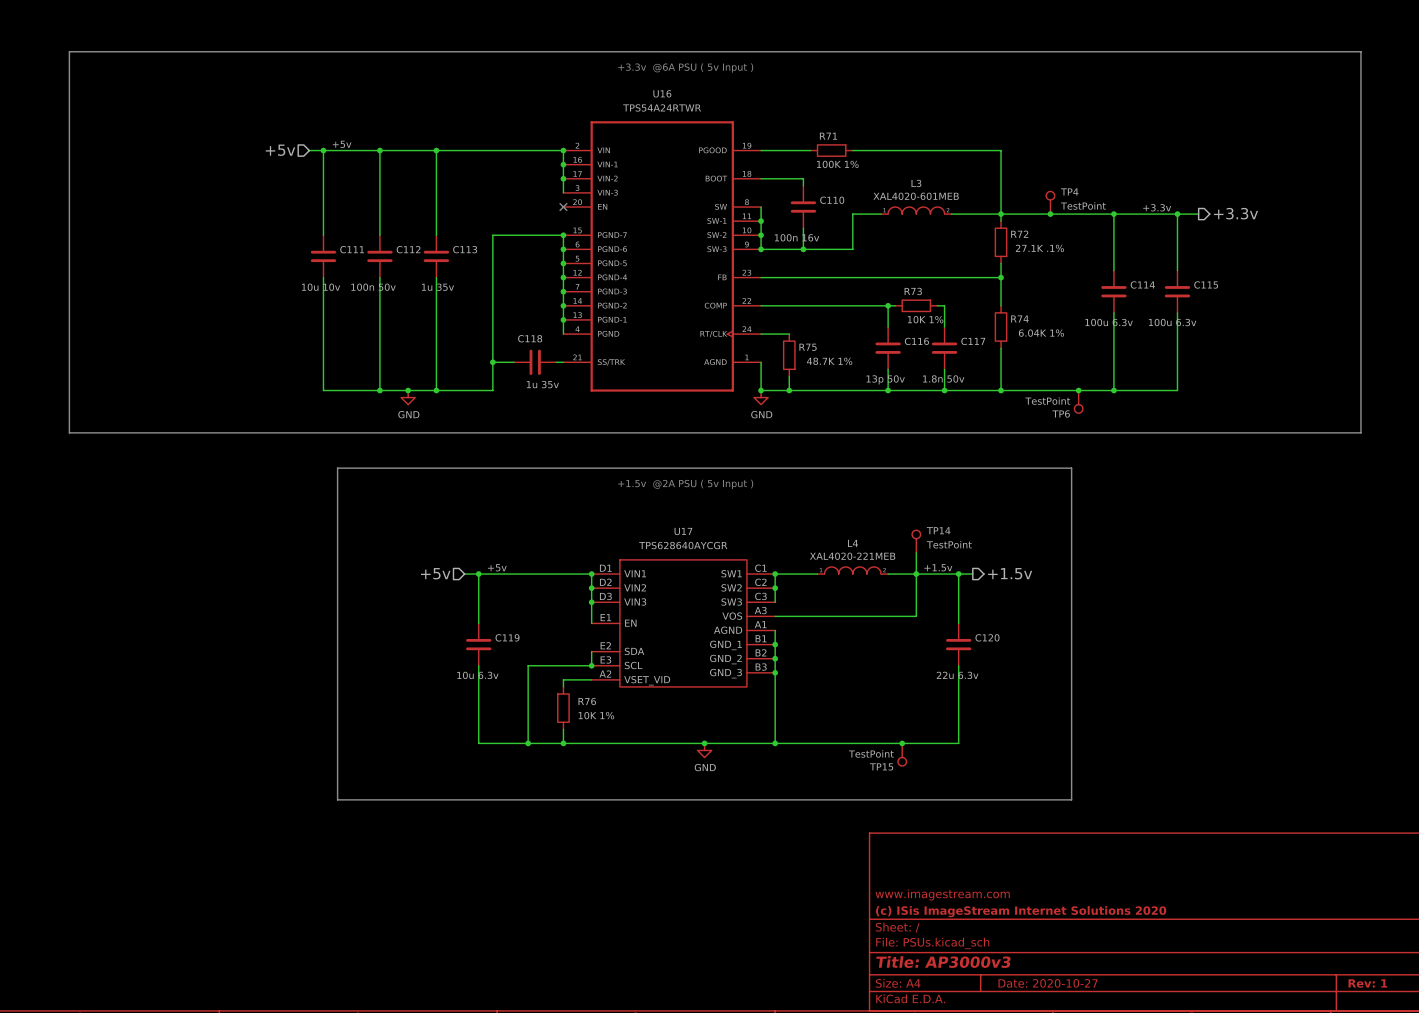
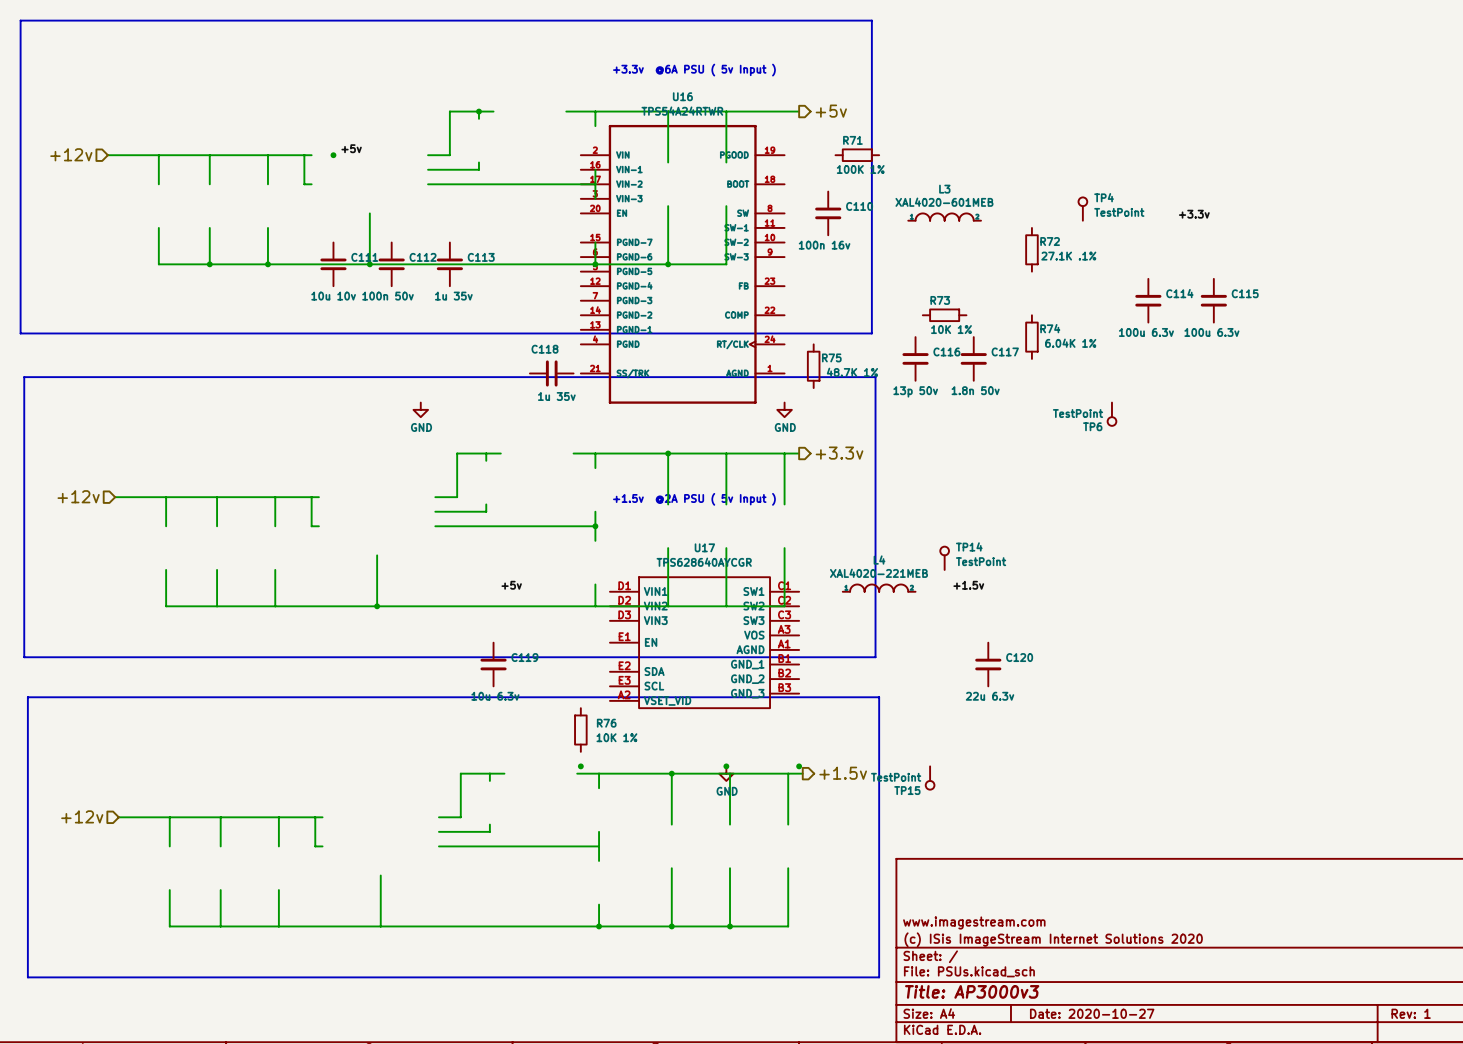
line: none -> (20, 20) (20, 333) (871, 333) (871, 20) (20, 20)
line: (69, 51) (69, 432) (1360, 432) (1360, 51) (69, 51) -> none
hierarchical label: none -> +5v (831, 111)
wire: none -> (478, 111) (478, 118)
junction: none -> (478, 111)
wire: none -> (493, 111) (449, 111) (449, 155)
wire: none -> (566, 111) (799, 111)
wire: none -> (595, 111) (595, 126)
wire: none -> (668, 111) (668, 162)
wire: none -> (726, 111) (726, 162)
hierarchical label: none -> +12v (71, 154)
wire: none -> (107, 155) (311, 155)
wire: none -> (158, 155) (158, 184)
wire: none -> (209, 155) (209, 184)
wire: none -> (267, 155) (267, 184)
hierarchical label: +5v (280, 150) -> none
wire: none -> (304, 155) (304, 184) (311, 184)
wire: (309, 150) (415, 150) -> none
wire: (323, 150) (323, 235) -> none
wire: (379, 150) (379, 235) -> none
junction: (379, 150) -> none
junction: (436, 150) -> none
junction: (563, 150) -> none
wire: (761, 150) (810, 150) -> none
wire: (852, 150) (1001, 150) (1001, 221) -> none
wire: none -> (478, 162) (478, 169) (428, 169)
junction: (563, 164) -> none
wire: none -> (595, 169) (595, 198)
wire: none -> (428, 184) (595, 184)
junction: (563, 178) -> none
wire: (761, 178) (803, 178) (803, 185) -> none
wire: (563, 192) (563, 150) (436, 150) (436, 235) -> none
wire: none -> (668, 206) (668, 264)
wire: none -> (726, 206) (726, 264) (158, 264) (158, 227)
wire: none -> (369, 213) (369, 264)
no-connect mark: (563, 207) -> none
wire: (761, 207) (761, 249) (852, 249) (852, 214) (881, 214) -> none
hierarchical label: +3.3v (1235, 213) -> none
wire: (951, 214) (1198, 214) -> none
junction: (1001, 214) -> none
junction: (1050, 214) -> none
wire: (1113, 214) (1113, 270) -> none
junction: (1113, 214) -> none
wire: (1177, 214) (1177, 270) -> none
junction: (1177, 214) -> none
wire: none -> (209, 227) (209, 264)
wire: none -> (267, 227) (267, 264)
junction: (761, 221) -> none
wire: (803, 228) (803, 249) -> none
junction: (563, 235) -> none
wire: none -> (595, 242) (595, 264)
junction: (761, 235) -> none
junction: (563, 249) -> none
junction: (761, 249) -> none
junction: (803, 249) -> none
junction: none -> (209, 264)
junction: none -> (267, 264)
junction: none -> (369, 264)
junction: none -> (595, 264)
junction: none -> (668, 264)
junction: (563, 263) -> none
wire: (1001, 263) (1001, 305) -> none
wire: (323, 277) (323, 390) (492, 390) (492, 235) (563, 235) (563, 334) -> none
wire: (379, 277) (379, 390) -> none
wire: (436, 277) (436, 390) -> none
junction: (563, 277) -> none
wire: (761, 277) (1001, 277) -> none
junction: (1001, 277) -> none
junction: (563, 291) -> none
junction: (563, 305) -> none
wire: (761, 305) (895, 305) -> none
wire: (888, 305) (888, 327) -> none
junction: (888, 305) -> none
wire: (937, 305) (944, 305) (944, 327) -> none
wire: (1113, 312) (1113, 390) -> none
wire: (1177, 312) (1177, 390) (761, 390) (761, 362) -> none
junction: (563, 319) -> none
wire: (761, 334) (789, 334) -> none
wire: (1001, 348) (1001, 390) -> none
wire: (492, 362) (514, 362) -> none
junction: (492, 362) -> none
wire: (556, 362) (563, 362) -> none
line: none -> (24, 377) (24, 657) (875, 657) (875, 377) (24, 377)
wire: (888, 369) (888, 390) -> none
wire: (944, 369) (944, 390) -> none
wire: (789, 376) (789, 390) -> none
junction: (379, 390) -> none
junction: (408, 390) -> none
junction: (436, 390) -> none
junction: (761, 390) -> none
junction: (789, 390) -> none
junction: (888, 390) -> none
junction: (944, 390) -> none
junction: (1001, 390) -> none
junction: (1078, 390) -> none
junction: (1113, 390) -> none
wire: none -> (486, 453) (486, 460)
wire: none -> (500, 453) (457, 453) (457, 497) (435, 497)
wire: none -> (573, 453) (799, 453)
wire: none -> (595, 453) (595, 468)
wire: none -> (668, 453) (668, 504)
junction: none -> (668, 453)
wire: none -> (726, 453) (726, 504)
wire: none -> (784, 453) (784, 504)
hierarchical label: none -> +3.3v (839, 453)
line: (337, 468) (337, 799) (1071, 799) (1071, 468) (337, 468) -> none
hierarchical label: none -> +12v (78, 496)
wire: none -> (115, 497) (318, 497)
wire: none -> (166, 497) (166, 526)
wire: none -> (217, 497) (217, 526)
wire: none -> (275, 497) (275, 526)
wire: none -> (311, 497) (311, 526) (318, 526)
wire: none -> (486, 504) (486, 511) (435, 511)
wire: none -> (595, 511) (595, 540)
wire: none -> (435, 526) (595, 526)
junction: none -> (595, 526)
wire: none -> (668, 548) (668, 606)
wire: none -> (726, 548) (726, 606)
wire: none -> (784, 548) (784, 606) (166, 606) (166, 569)
wire: none -> (217, 569) (217, 606)
wire: none -> (275, 569) (275, 606)
wire: (916, 552) (916, 616) (775, 616) -> none
wire: none -> (595, 584) (595, 606)
hierarchical label: +5v (435, 573) -> none
hierarchical label: +1.5v (1010, 573) -> none
wire: (464, 574) (591, 574) (591, 623) -> none
wire: (478, 574) (478, 623) -> (377, 555) (377, 606)
junction: (478, 574) -> none
junction: (591, 574) -> none
junction: (775, 574) -> none
wire: (817, 574) (775, 574) (775, 602) -> none
wire: (888, 574) (972, 574) -> none
junction: (916, 574) -> none
wire: (958, 574) (958, 623) -> none
junction: (958, 574) -> none
junction: none -> (377, 606)
junction: (591, 588) -> none
junction: (775, 588) -> none
junction: (591, 602) -> none
wire: (775, 630) (775, 743) -> none
junction: (775, 644) -> none
wire: (591, 651) (591, 665) (528, 665) (528, 743) -> none
junction: (775, 658) -> none
wire: (478, 665) (478, 743) (958, 743) (958, 665) -> none
junction: (591, 665) -> none
junction: (775, 672) -> none
line: none -> (27, 697) (27, 977) (879, 977) (879, 697) (27, 697)
wire: (591, 679) (563, 679) (563, 686) -> none
wire: (563, 729) (563, 743) -> (599, 773) (599, 788)
junction: (528, 743) -> none
junction: (902, 743) -> none
wire: none -> (489, 773) (489, 780)
wire: none -> (504, 773) (460, 773) (460, 817) (438, 817)
wire: none -> (577, 773) (802, 773)
wire: none -> (671, 773) (671, 824)
junction: none -> (671, 773)
wire: none -> (730, 773) (730, 824)
wire: none -> (788, 773) (788, 824)
hierarchical label: none -> +1.5v (843, 773)
hierarchical label: none -> +12v (82, 816)
wire: none -> (118, 817) (322, 817)
wire: none -> (169, 817) (169, 846)
wire: none -> (220, 817) (220, 846)
wire: none -> (278, 817) (278, 846)
wire: none -> (315, 817) (315, 846) (322, 846)
wire: none -> (489, 824) (489, 831) (438, 831)
wire: none -> (599, 831) (599, 860)
wire: none -> (438, 846) (599, 846)
wire: none -> (671, 868) (671, 926)
wire: none -> (730, 868) (730, 926)
wire: none -> (788, 868) (788, 926) (169, 926) (169, 890)
wire: none -> (380, 875) (380, 926)
wire: none -> (220, 890) (220, 926)
wire: none -> (278, 890) (278, 926)
wire: none -> (599, 904) (599, 926)
junction: none -> (599, 926)
junction: none -> (671, 926)
junction: none -> (730, 926)

